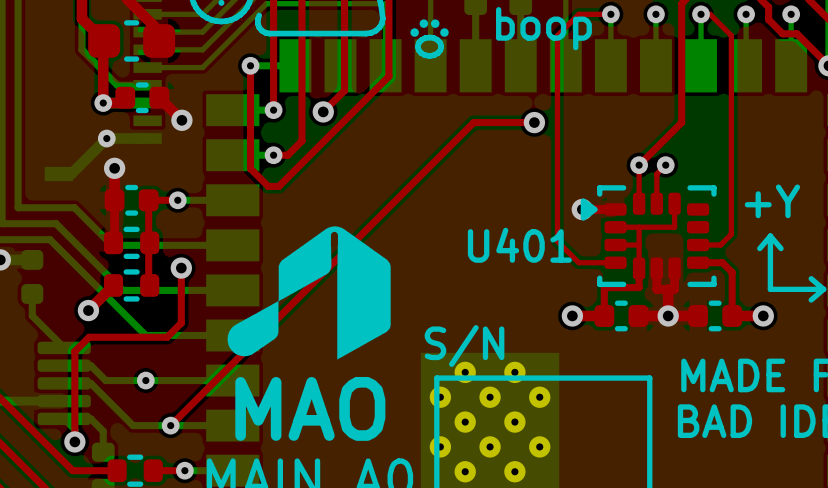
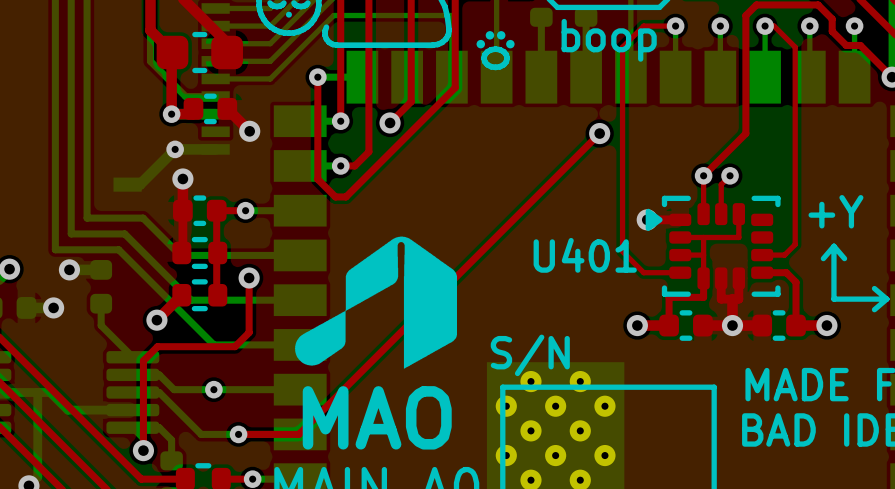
top track: (534, 122) (473, 122) (170, 425) -> (599, 133) (298, 434) (238, 434)

